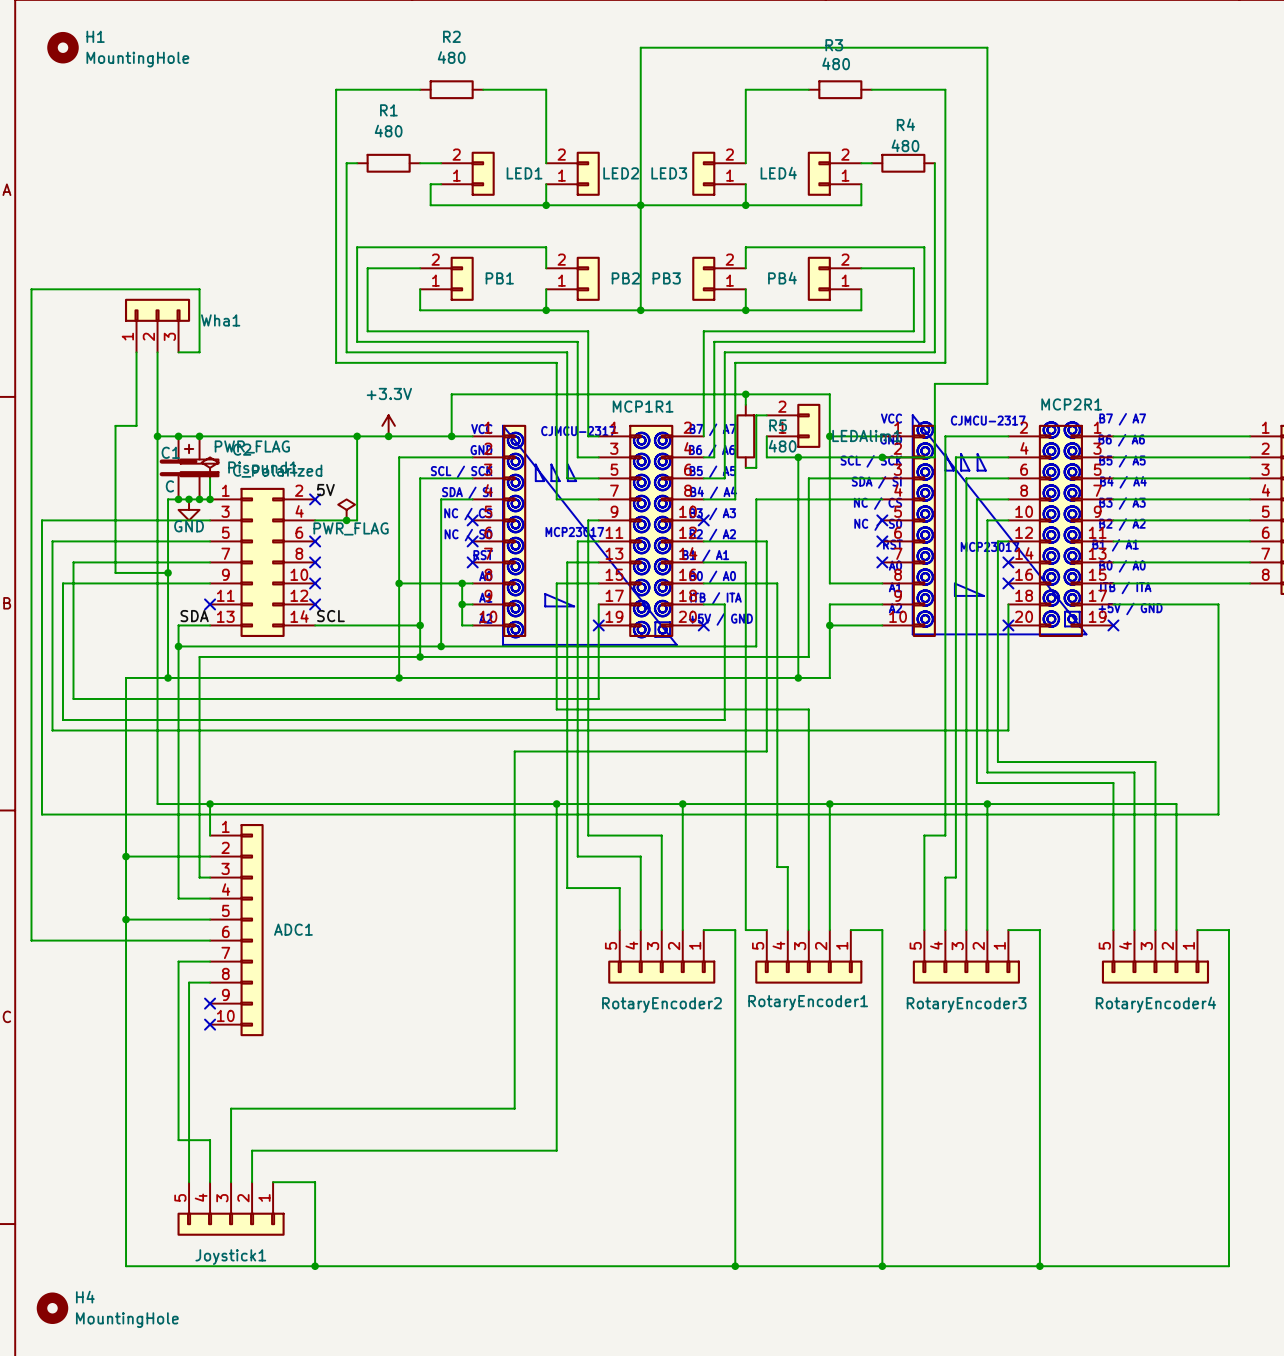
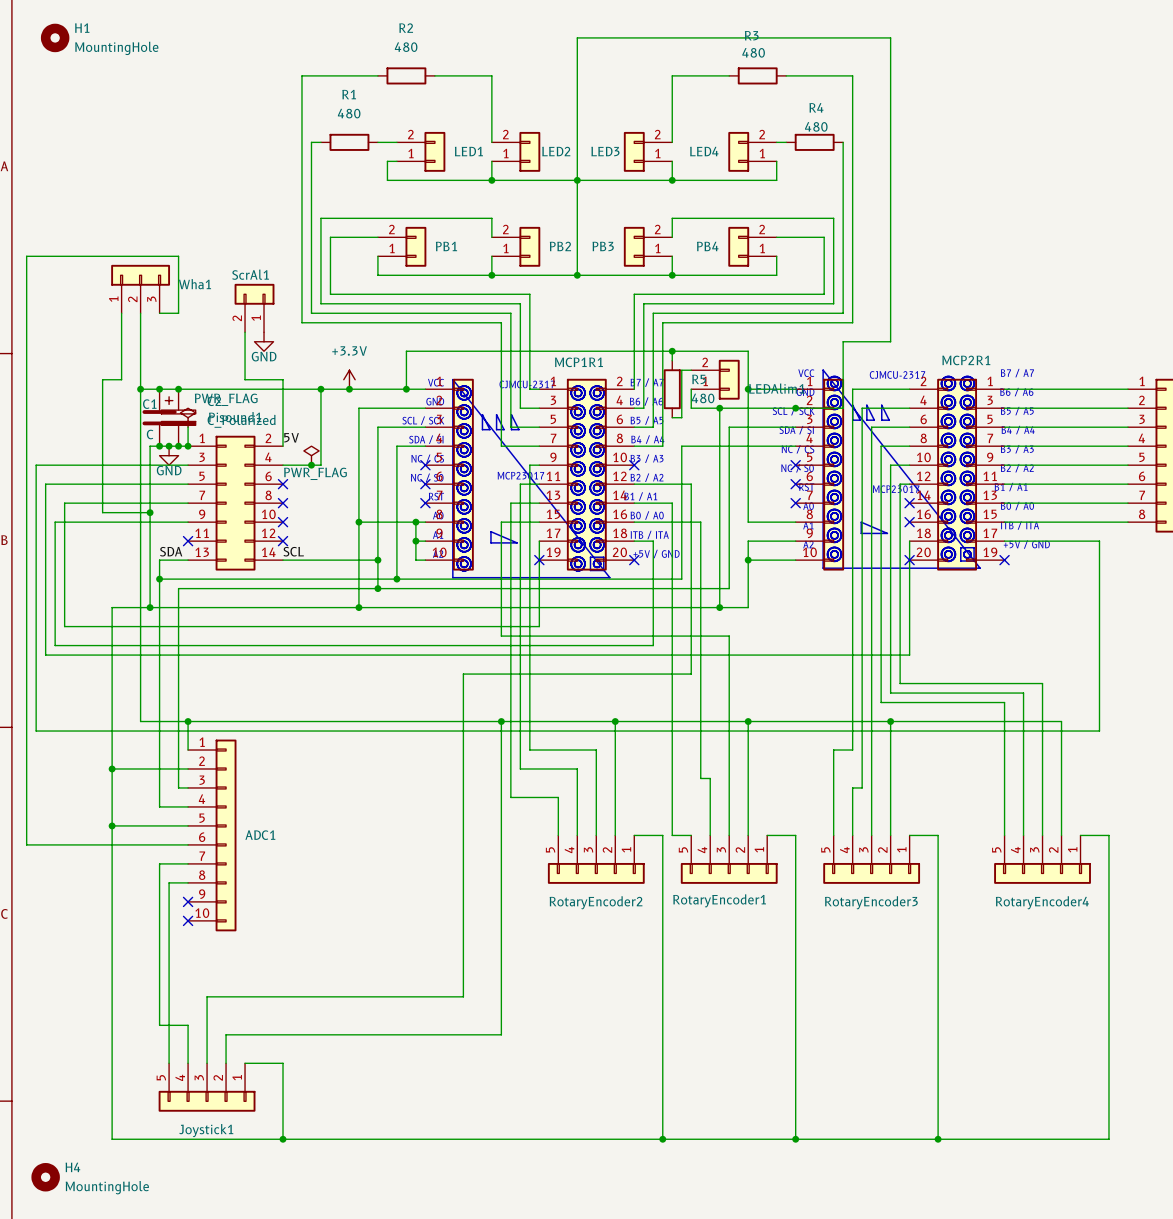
ScrAl1: none -> (254, 308)
wire: none -> (245, 332) (245, 379) (283, 379) (283, 446)
power symbol: none -> GND (264, 341)
no-connect mark: (315, 499) -> none

